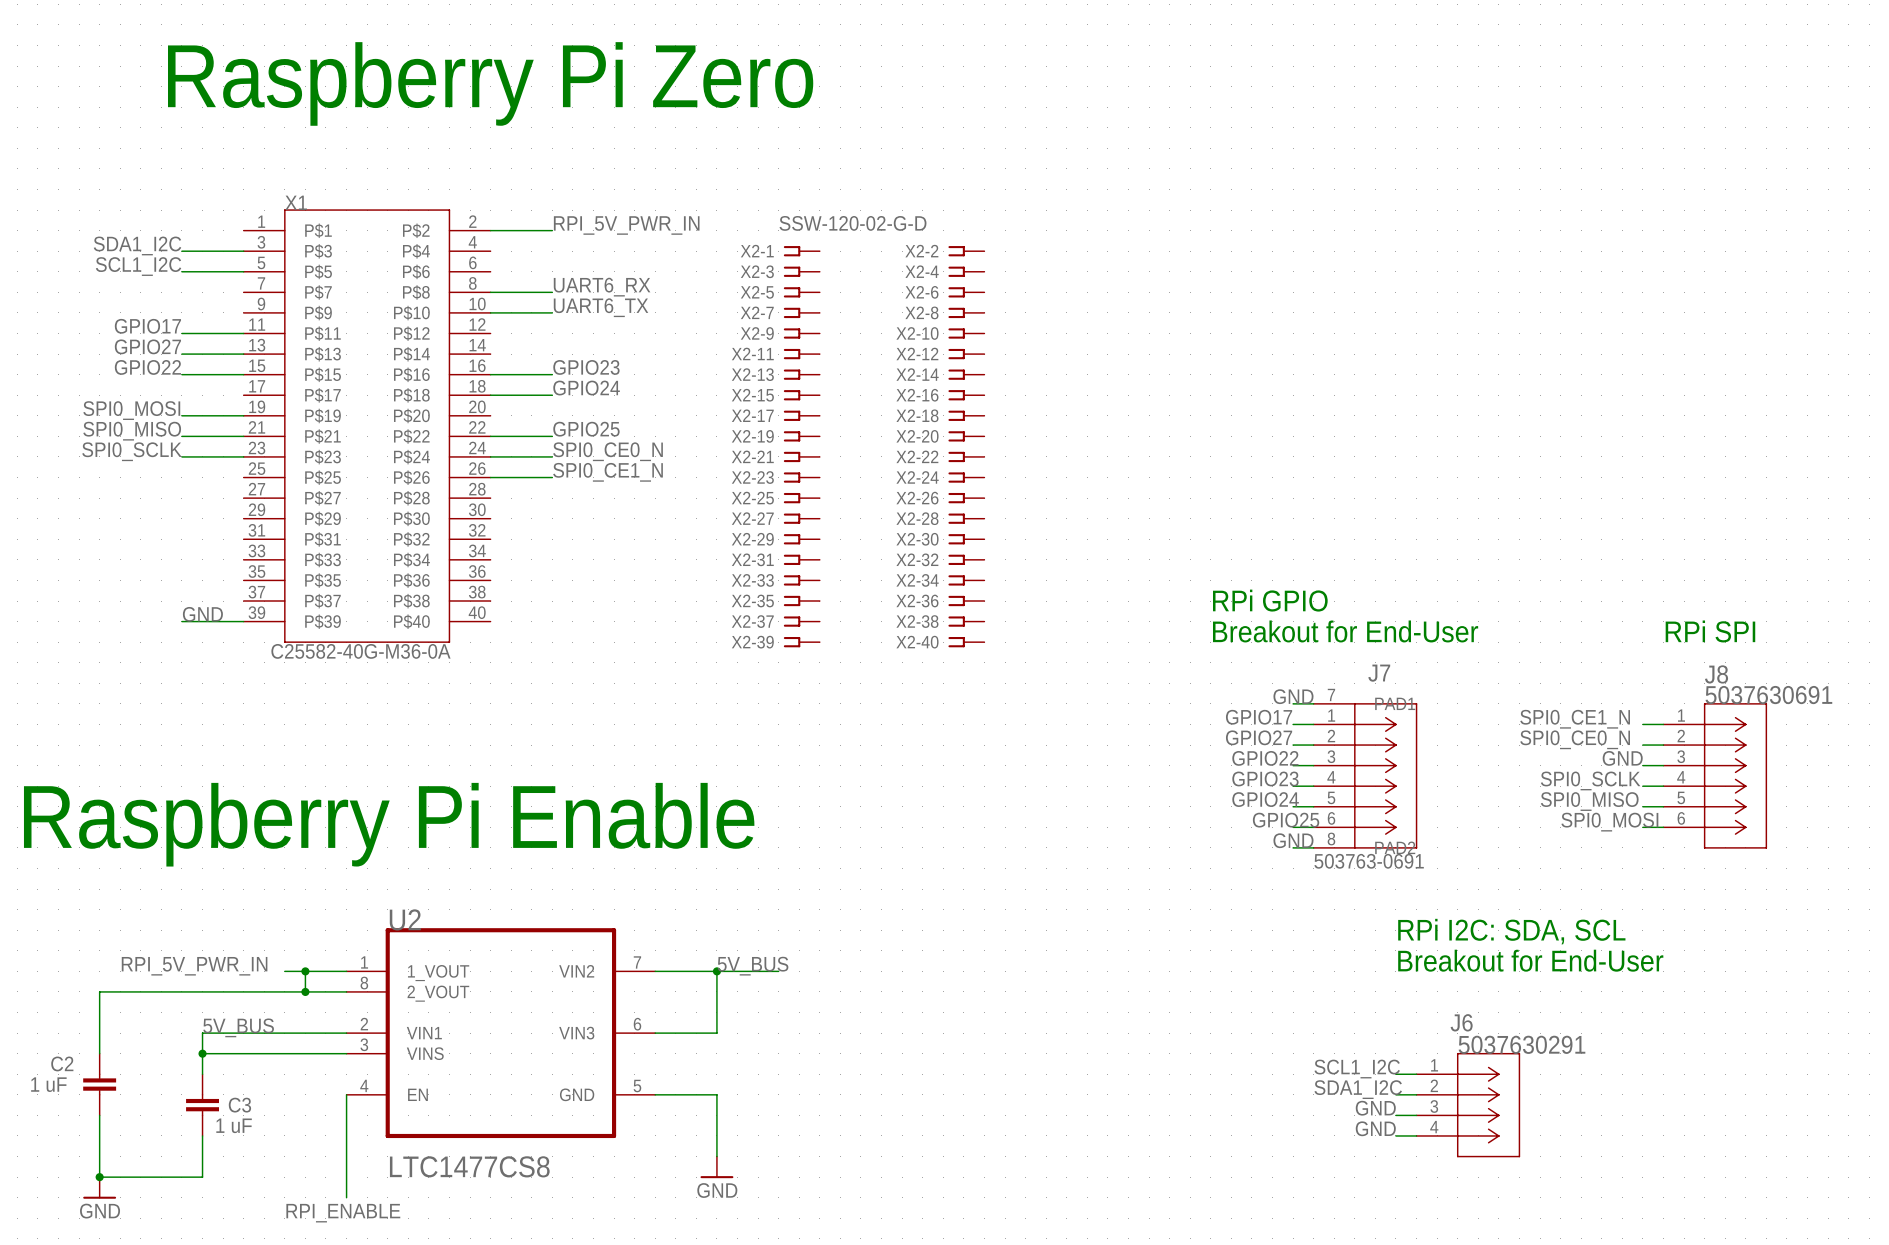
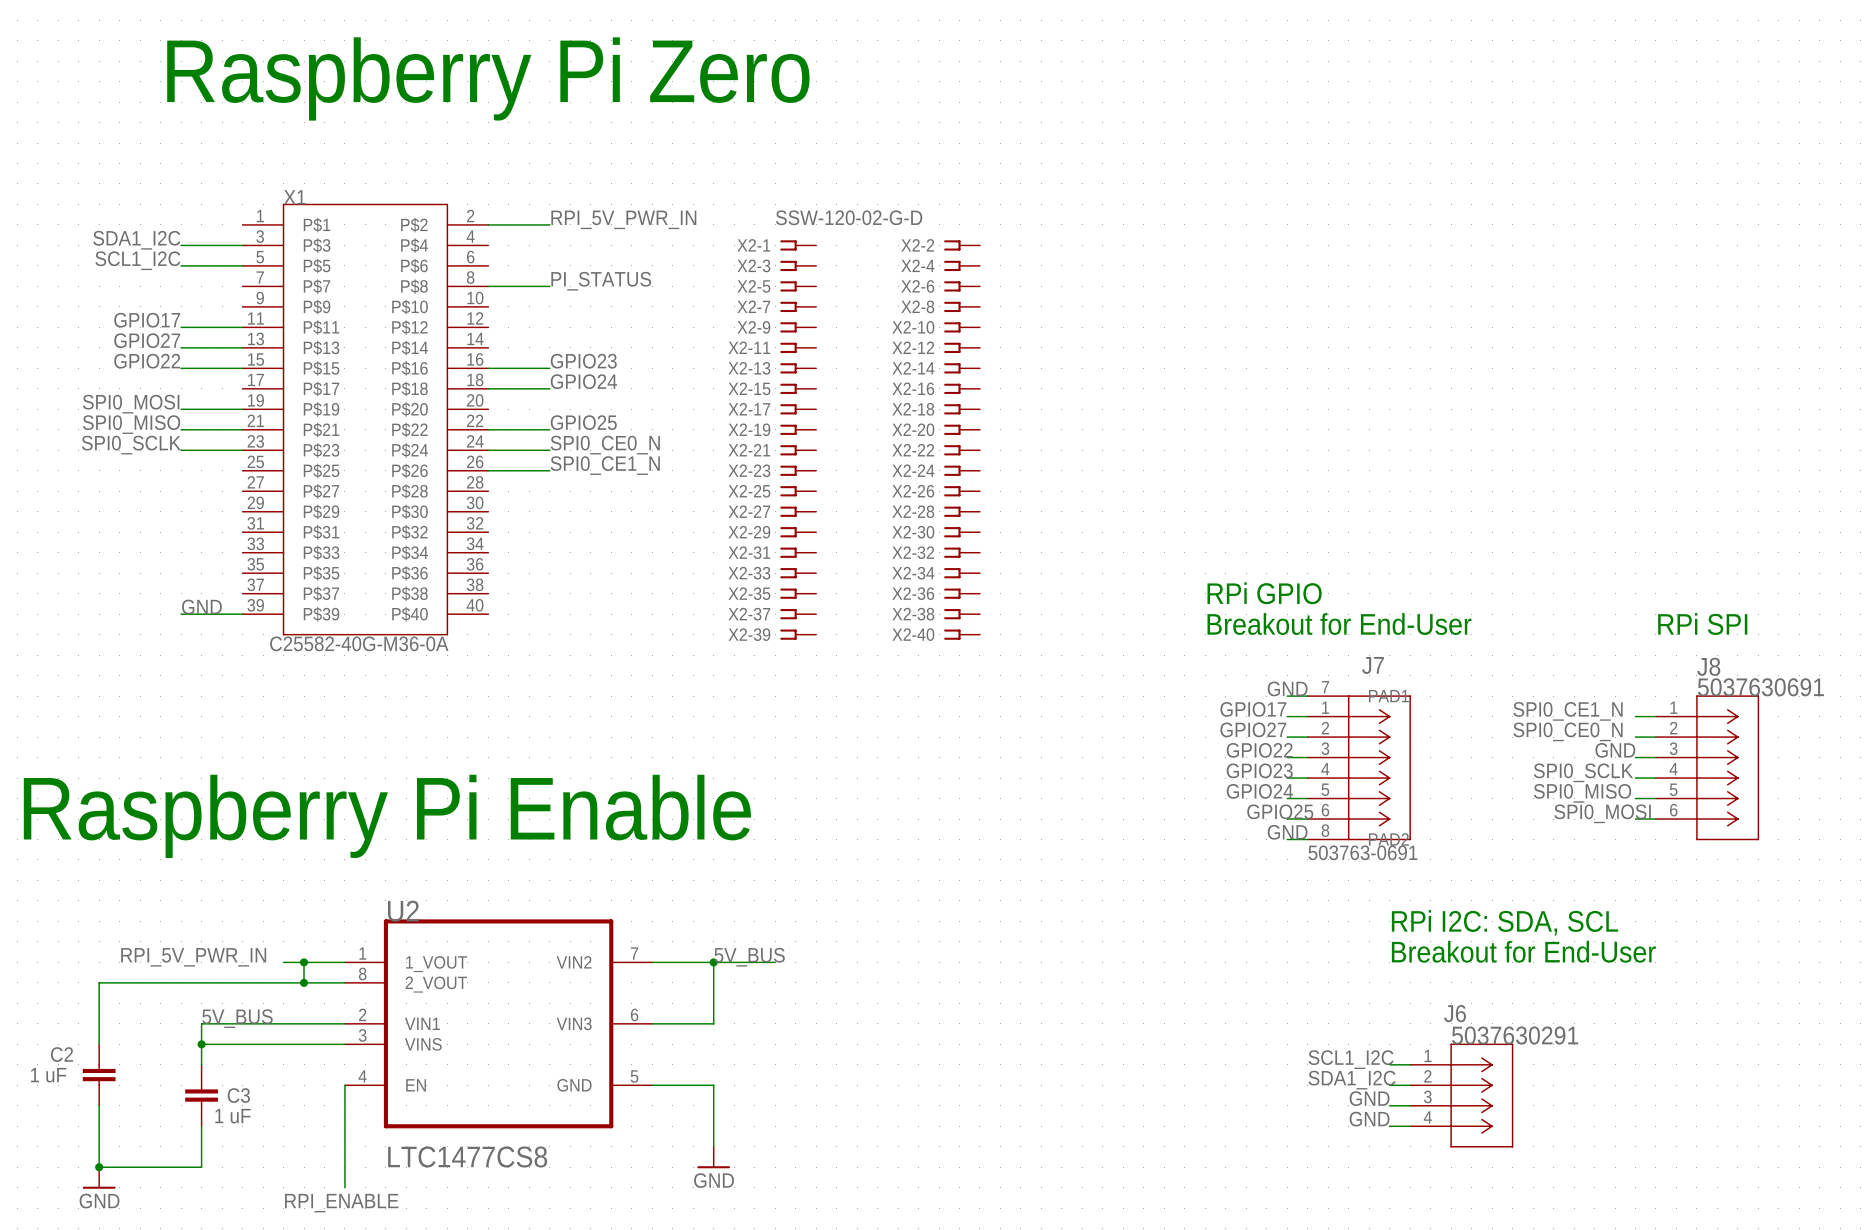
label: UART6_RX (602, 287) -> PI_STATUS (601, 281)
label: UART6_TX (601, 307) -> none
wire: (490, 312) (552, 312) -> none

